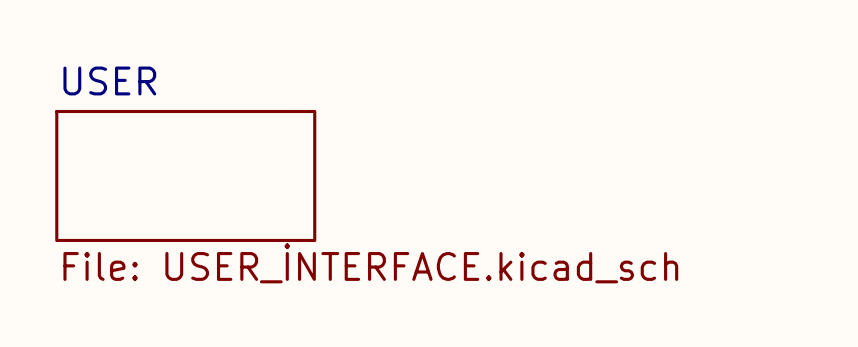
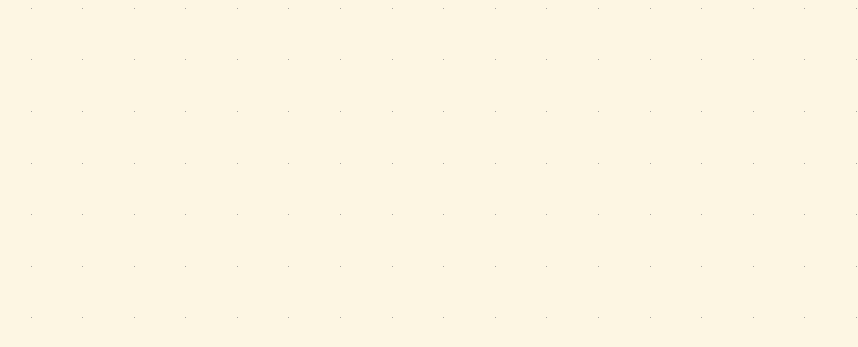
sheet USER: File: USER_İNTERFACE.kicad_sch (185, 175) -> none

